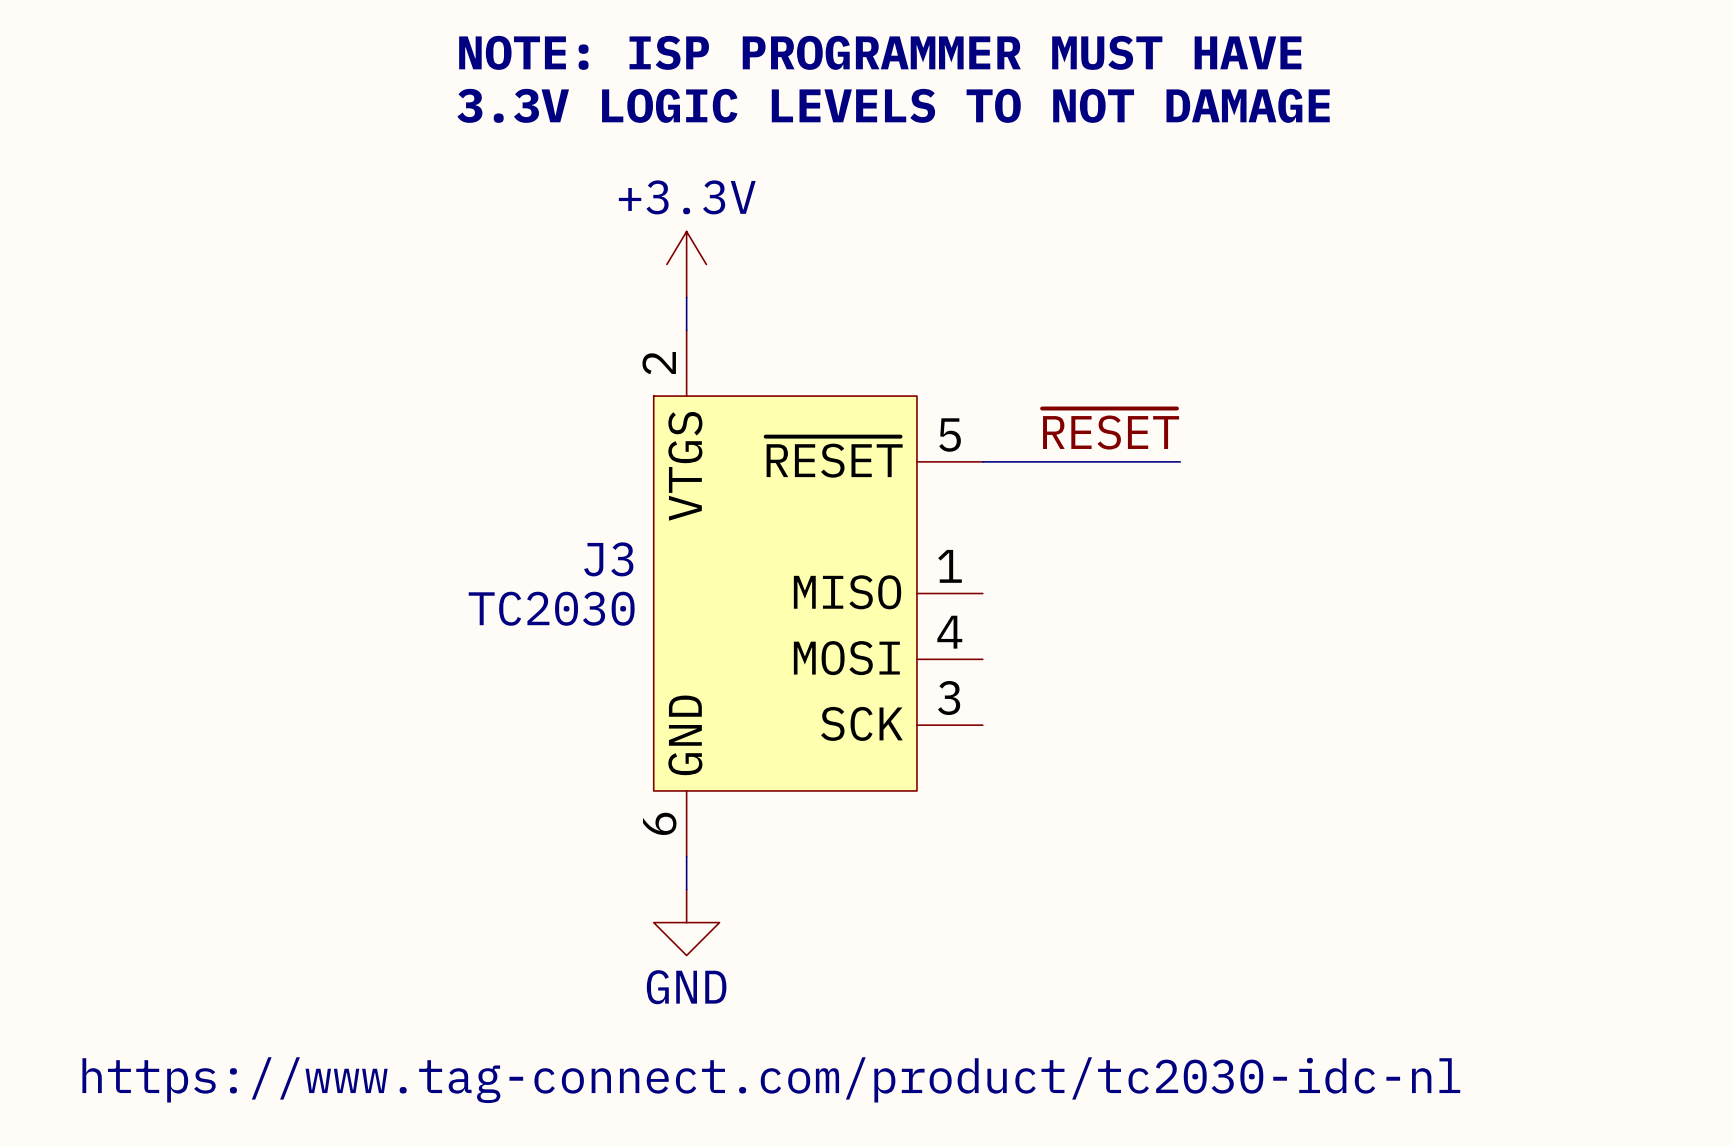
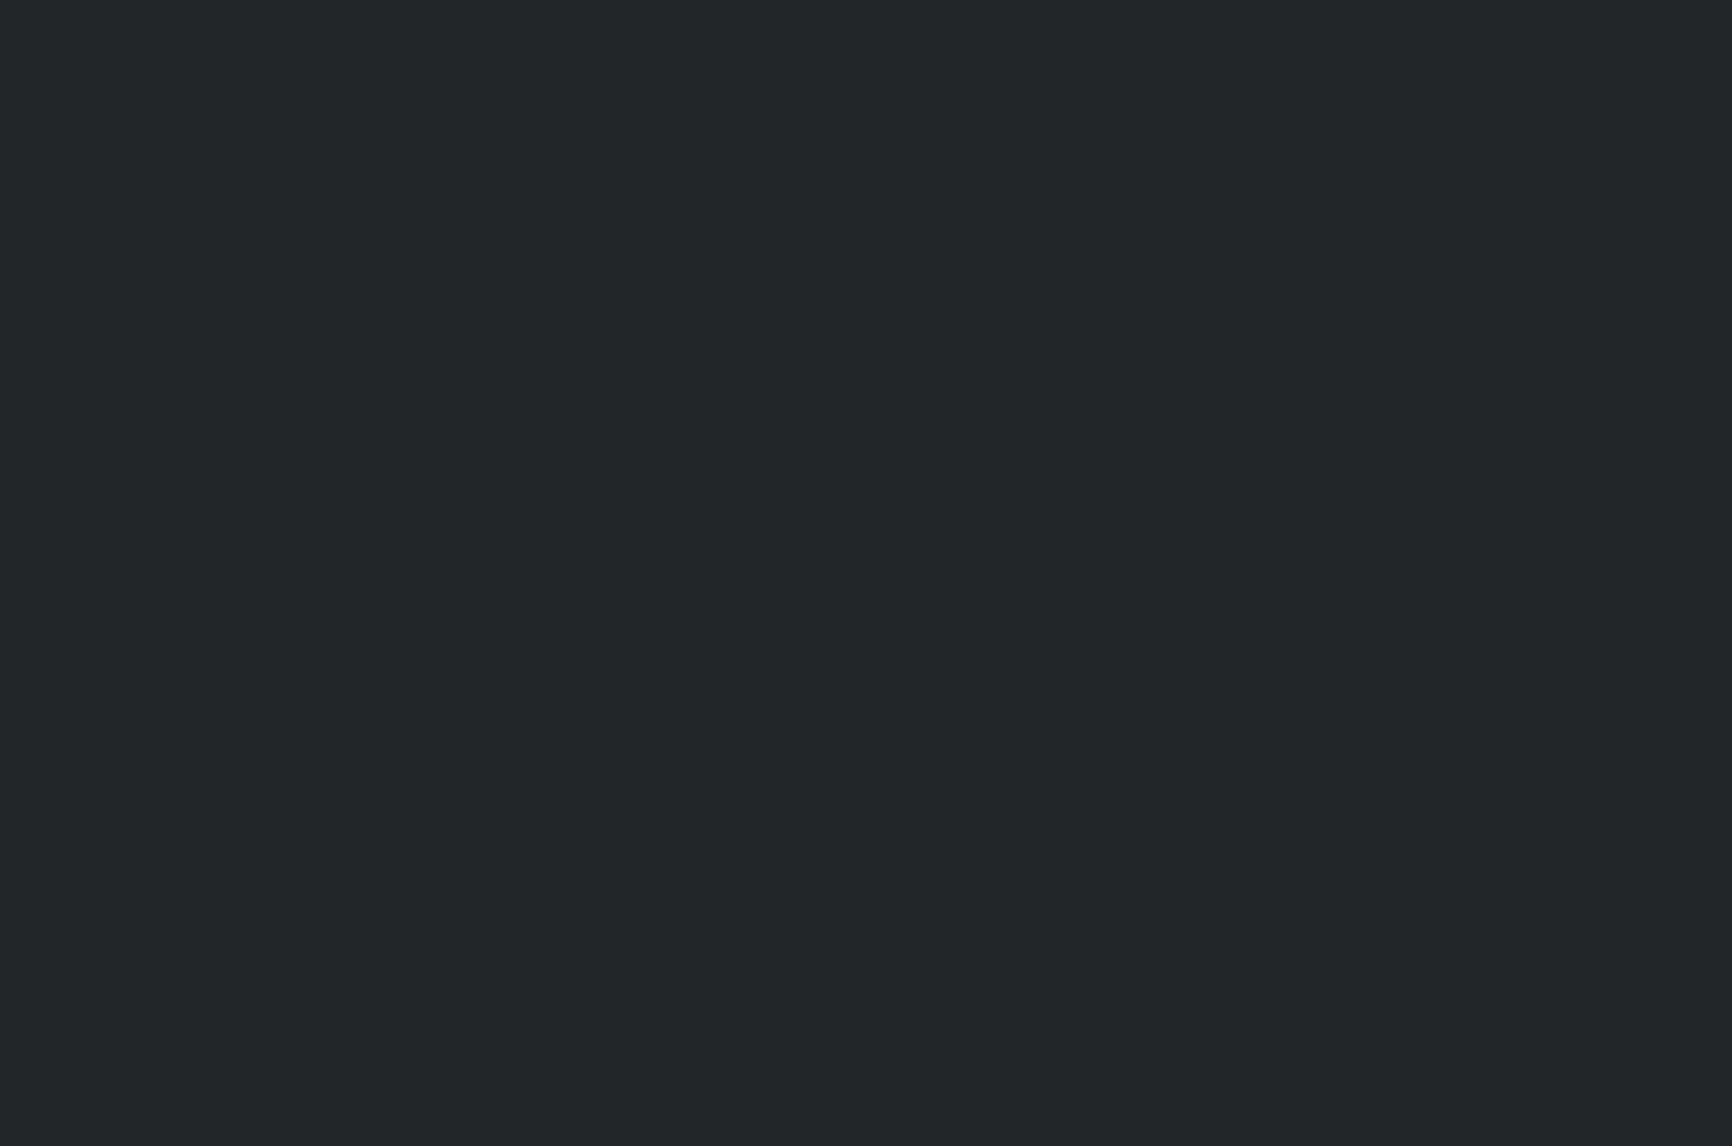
text: NOTE: ISP PROGRAMMER MUST HAVE (880, 52) -> none
text: 3.3V LOGIC LEVELS TO NOT DAMAGE (893, 105) -> none
power symbol: +3.3V (686, 264) -> none
wire: (686, 297) (686, 330) -> none
label: ~{RESET} (1110, 429) -> none
wire: (982, 461) (1180, 461) -> none
J3: TC2030 (818, 593) -> none
wire: (686, 856) (686, 889) -> none
power symbol: GND (686, 922) -> none
text: https://www.tag-connect.com/product/tc2030-idc-nl (771, 1080) -> none

